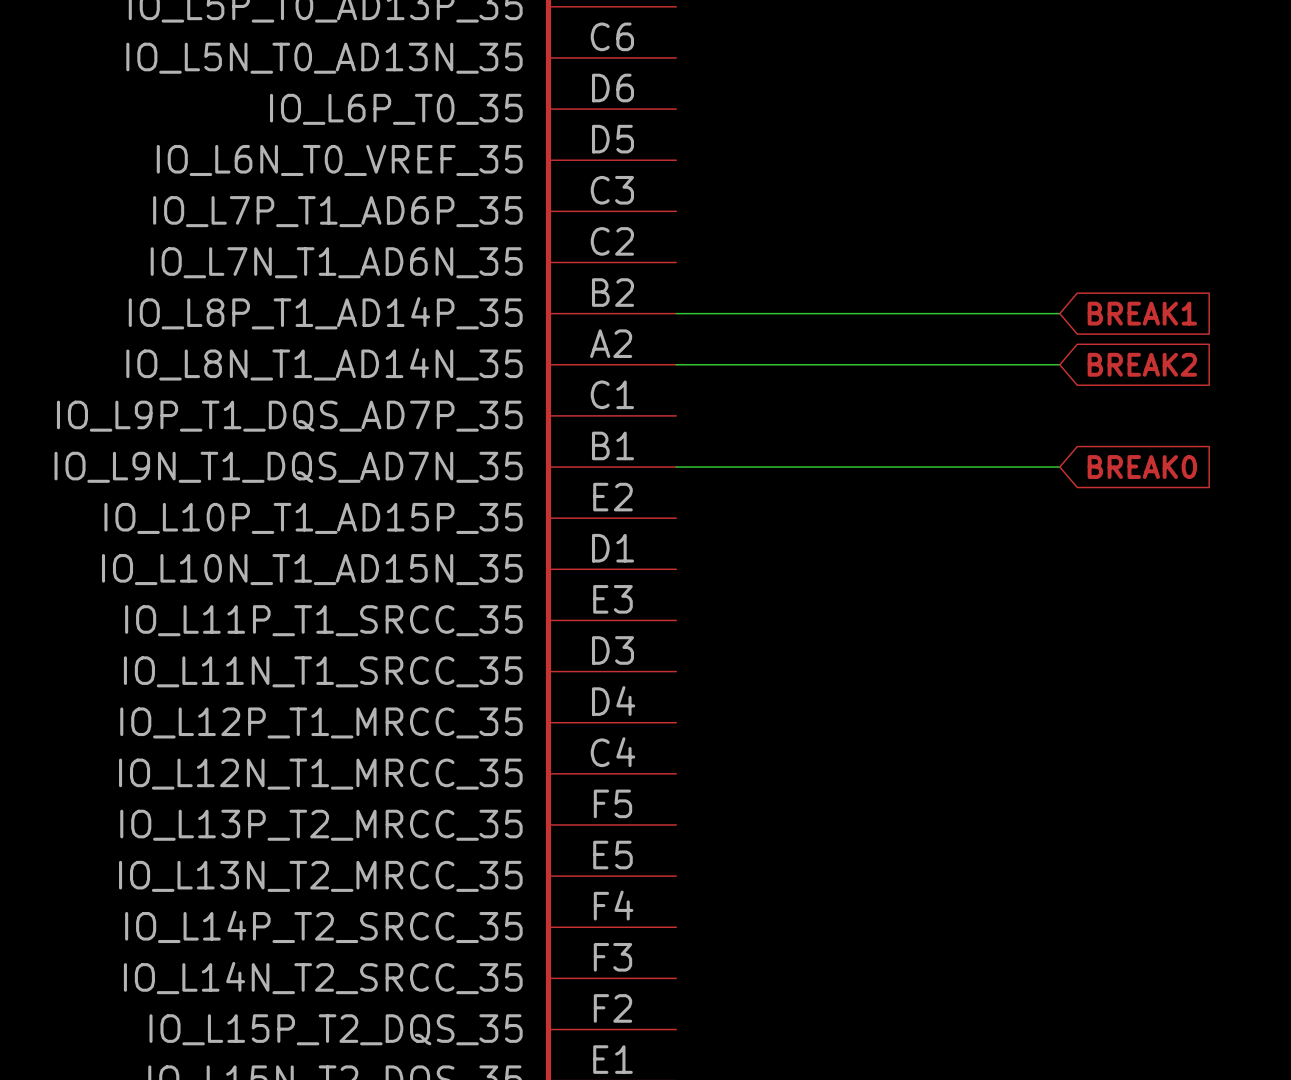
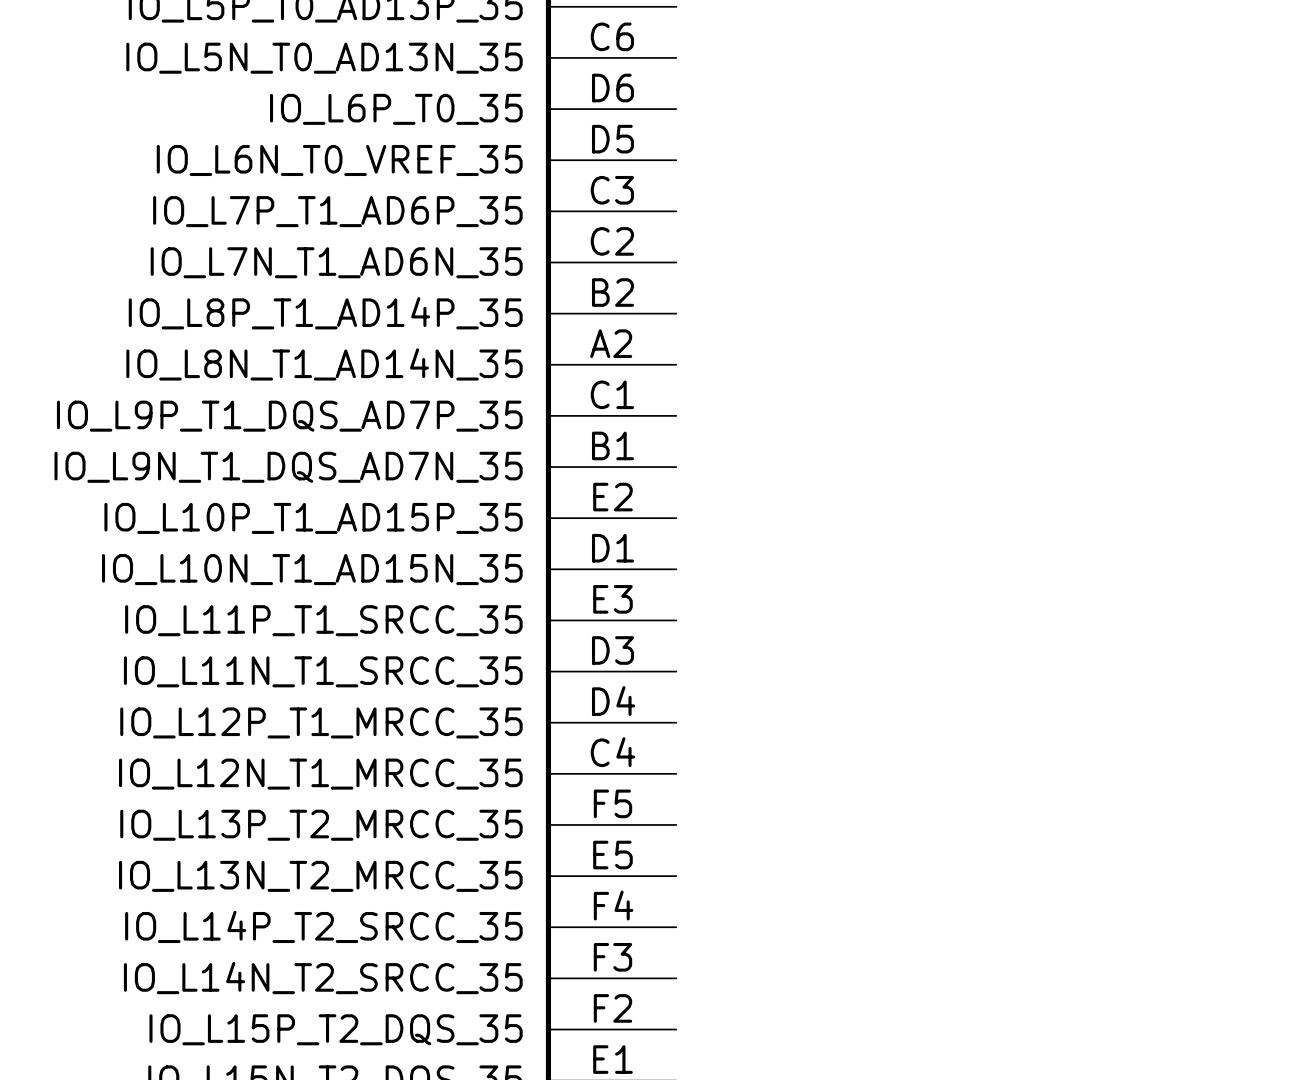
wire: (676, 313) (1059, 313) -> none
global label: BREAK1 (1142, 313) -> none
wire: (676, 364) (1059, 364) -> none
global label: BREAK2 (1142, 364) -> none
wire: (676, 467) (1059, 467) -> none
global label: BREAK0 (1142, 467) -> none

